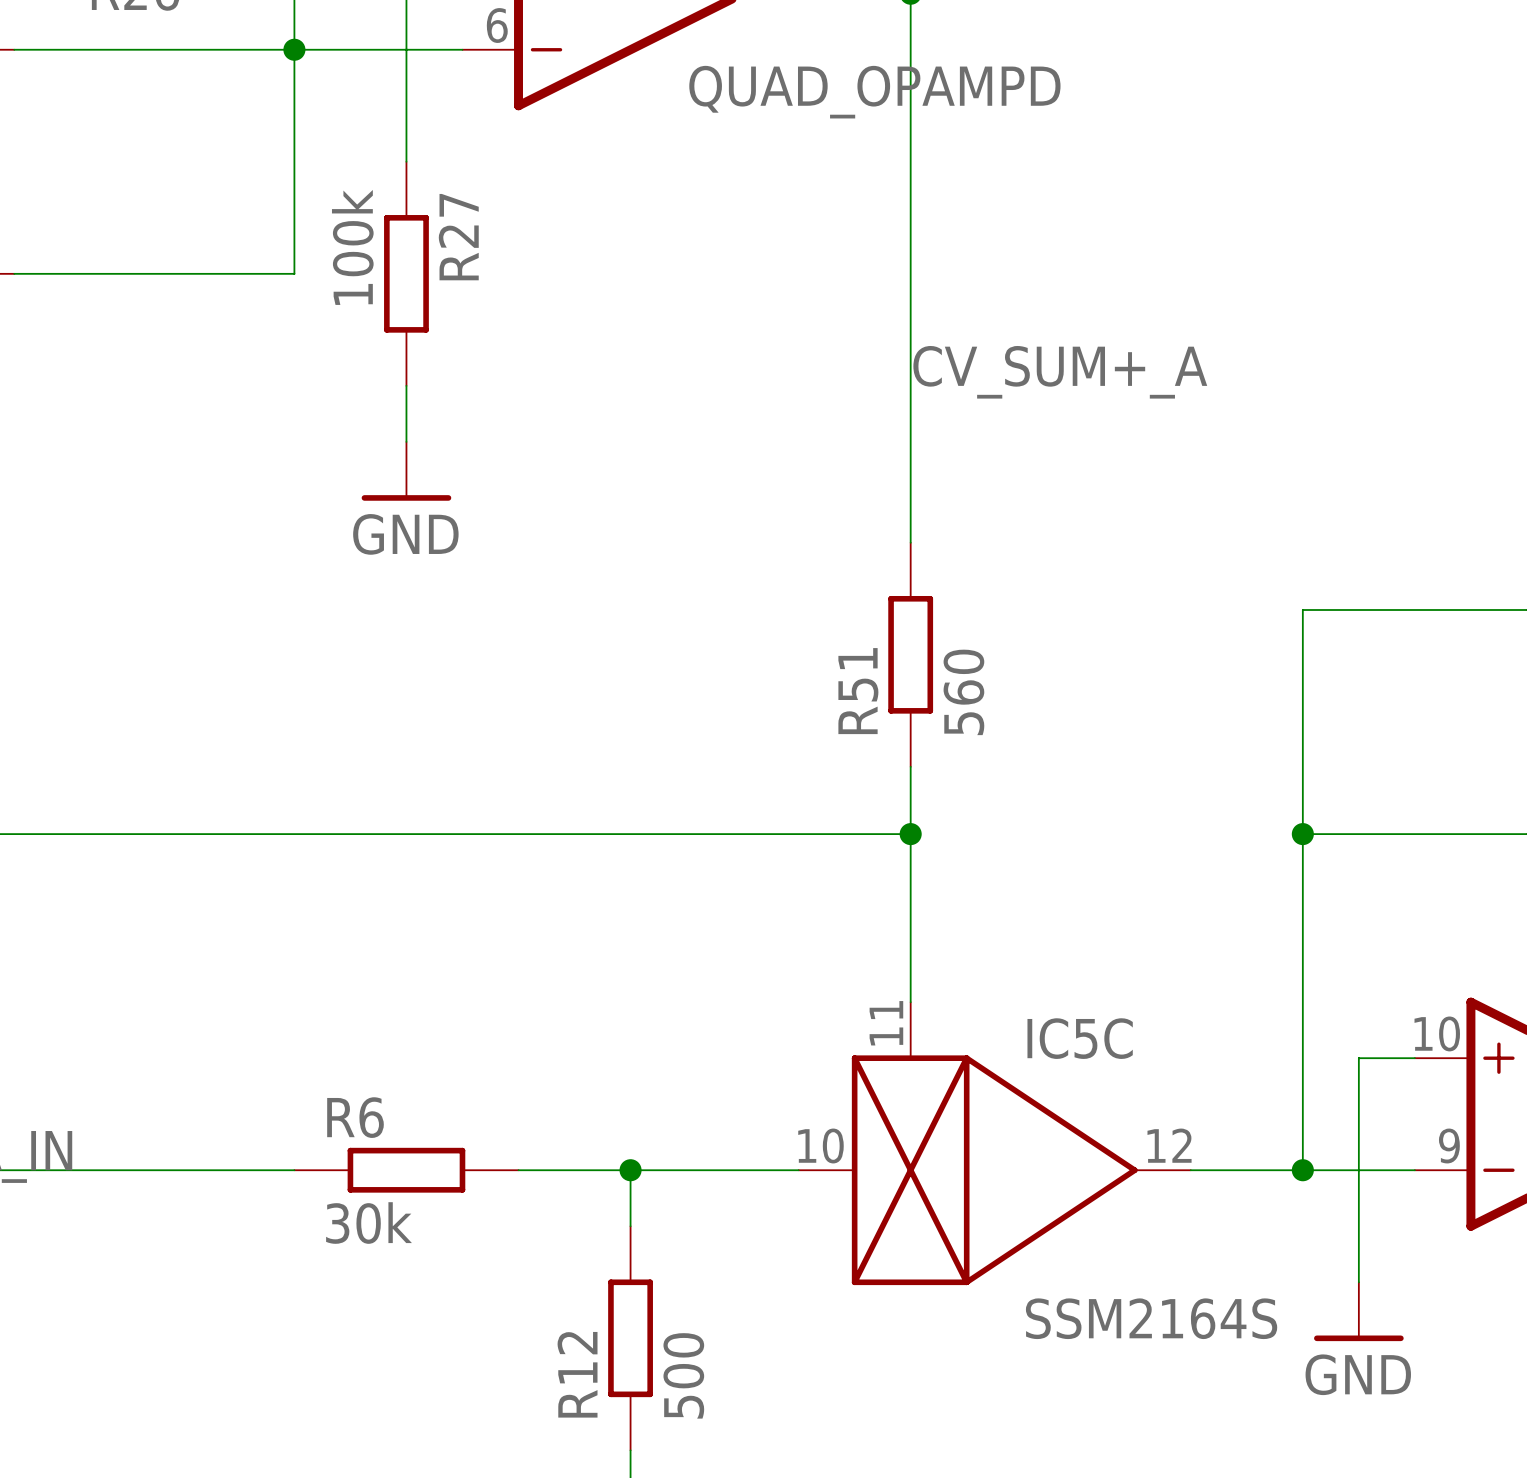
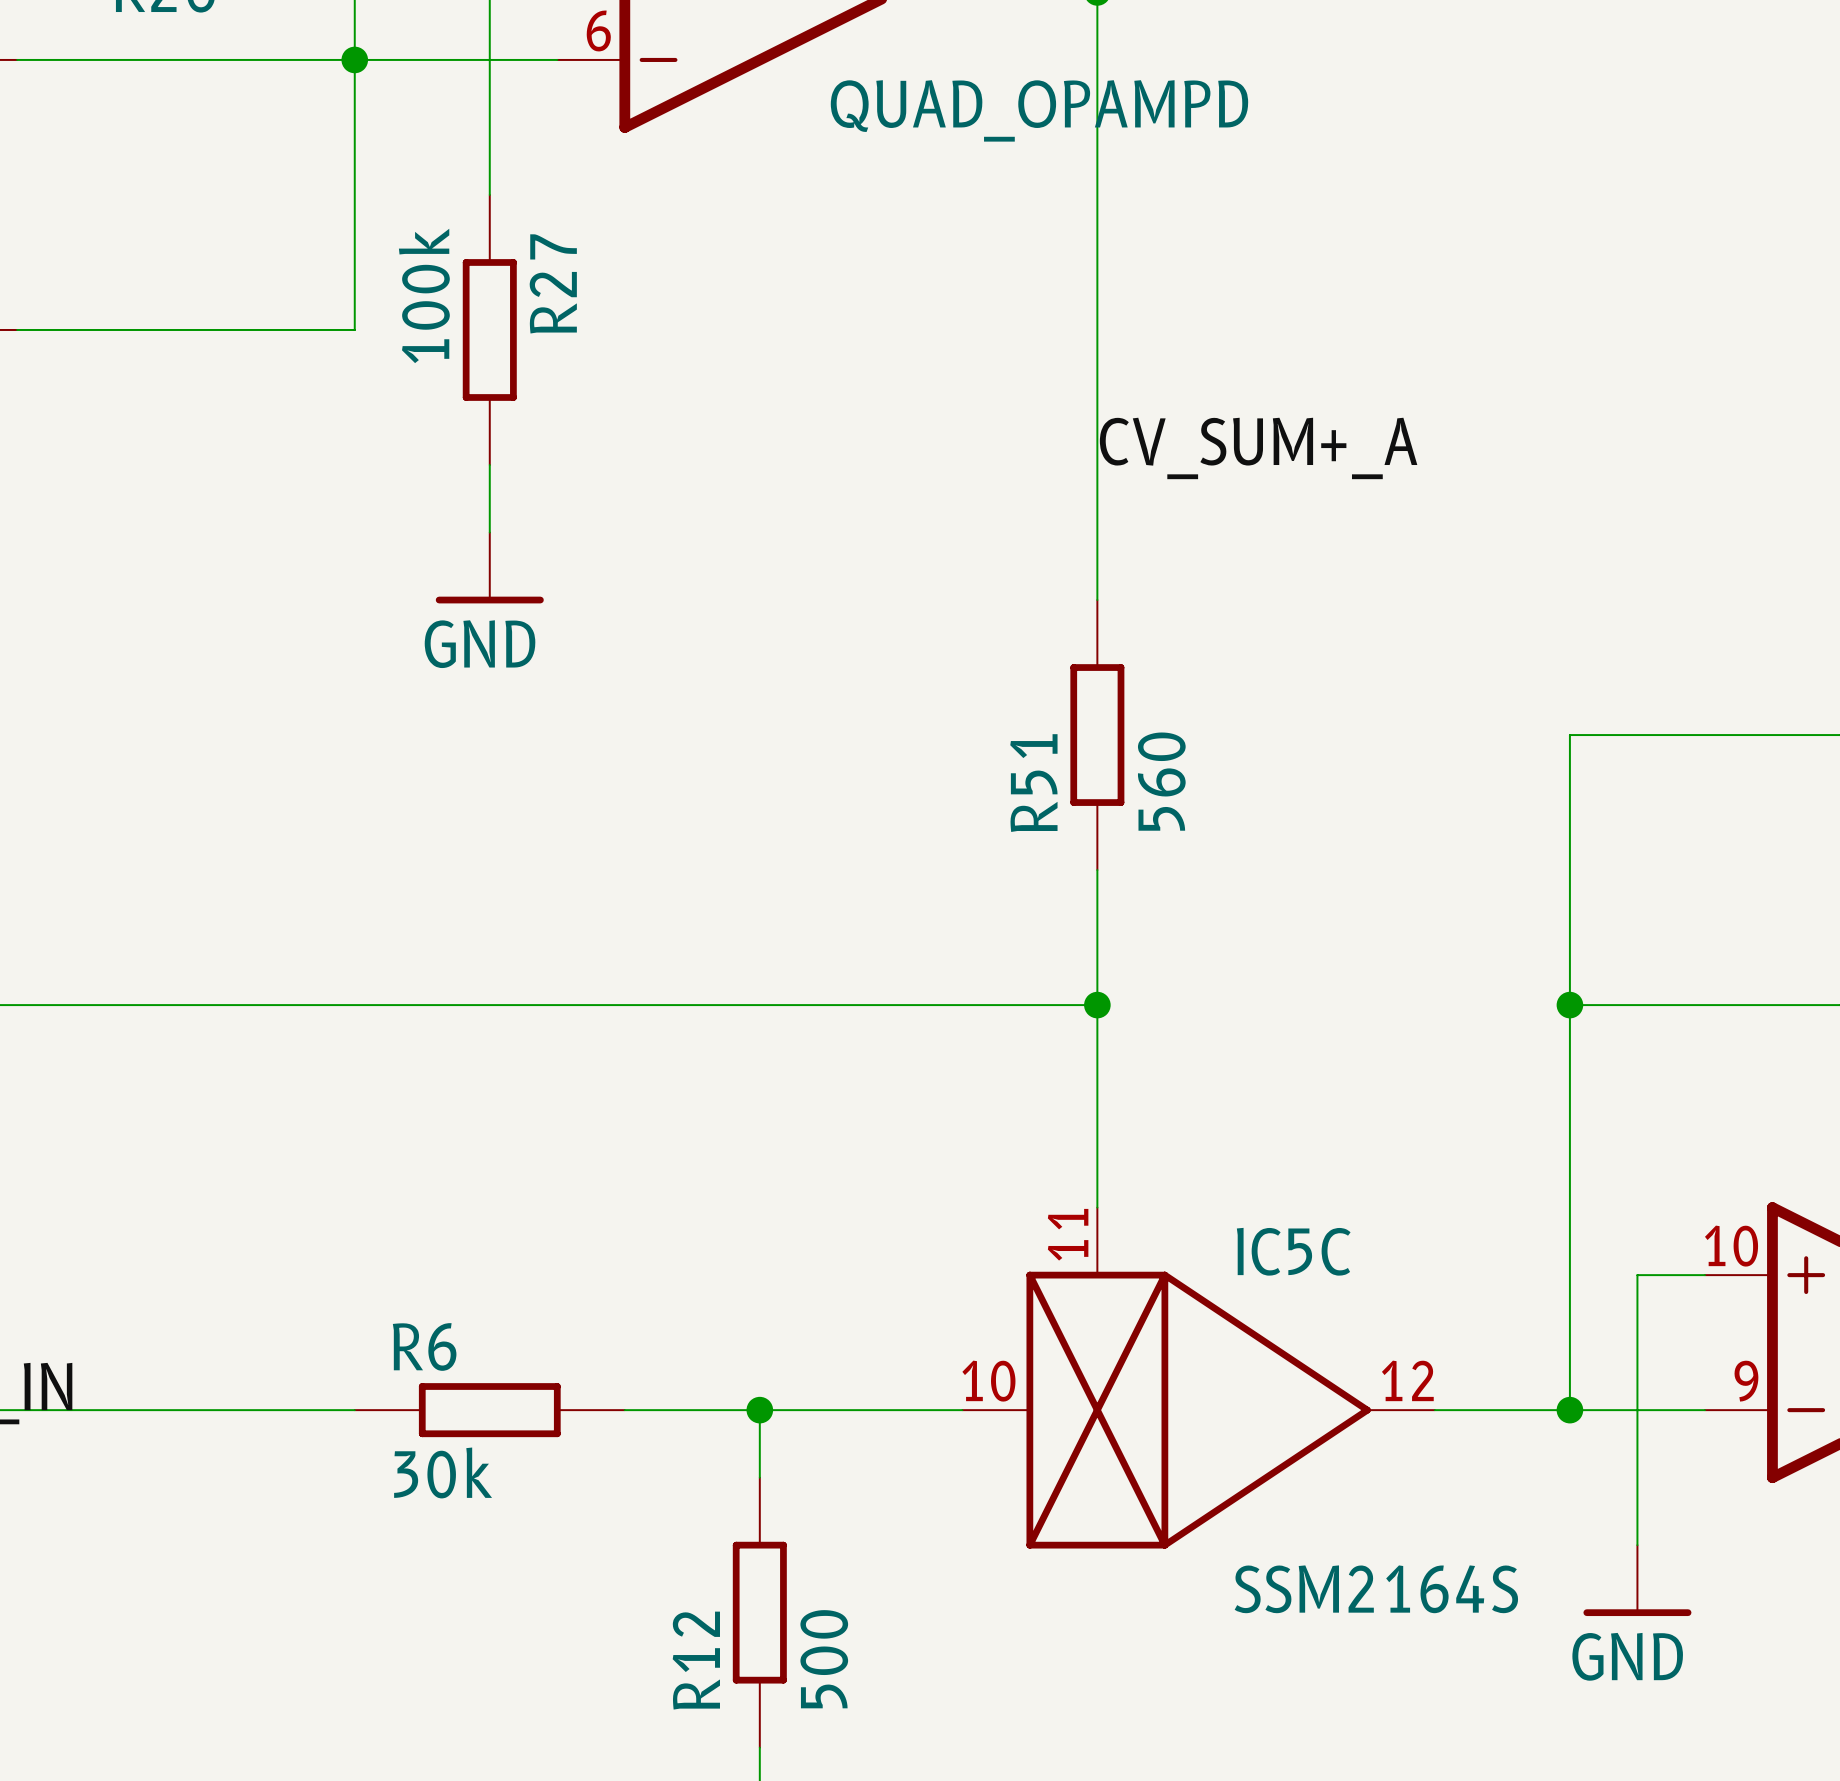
R51 position: (910, 654) -> (1097, 735)

